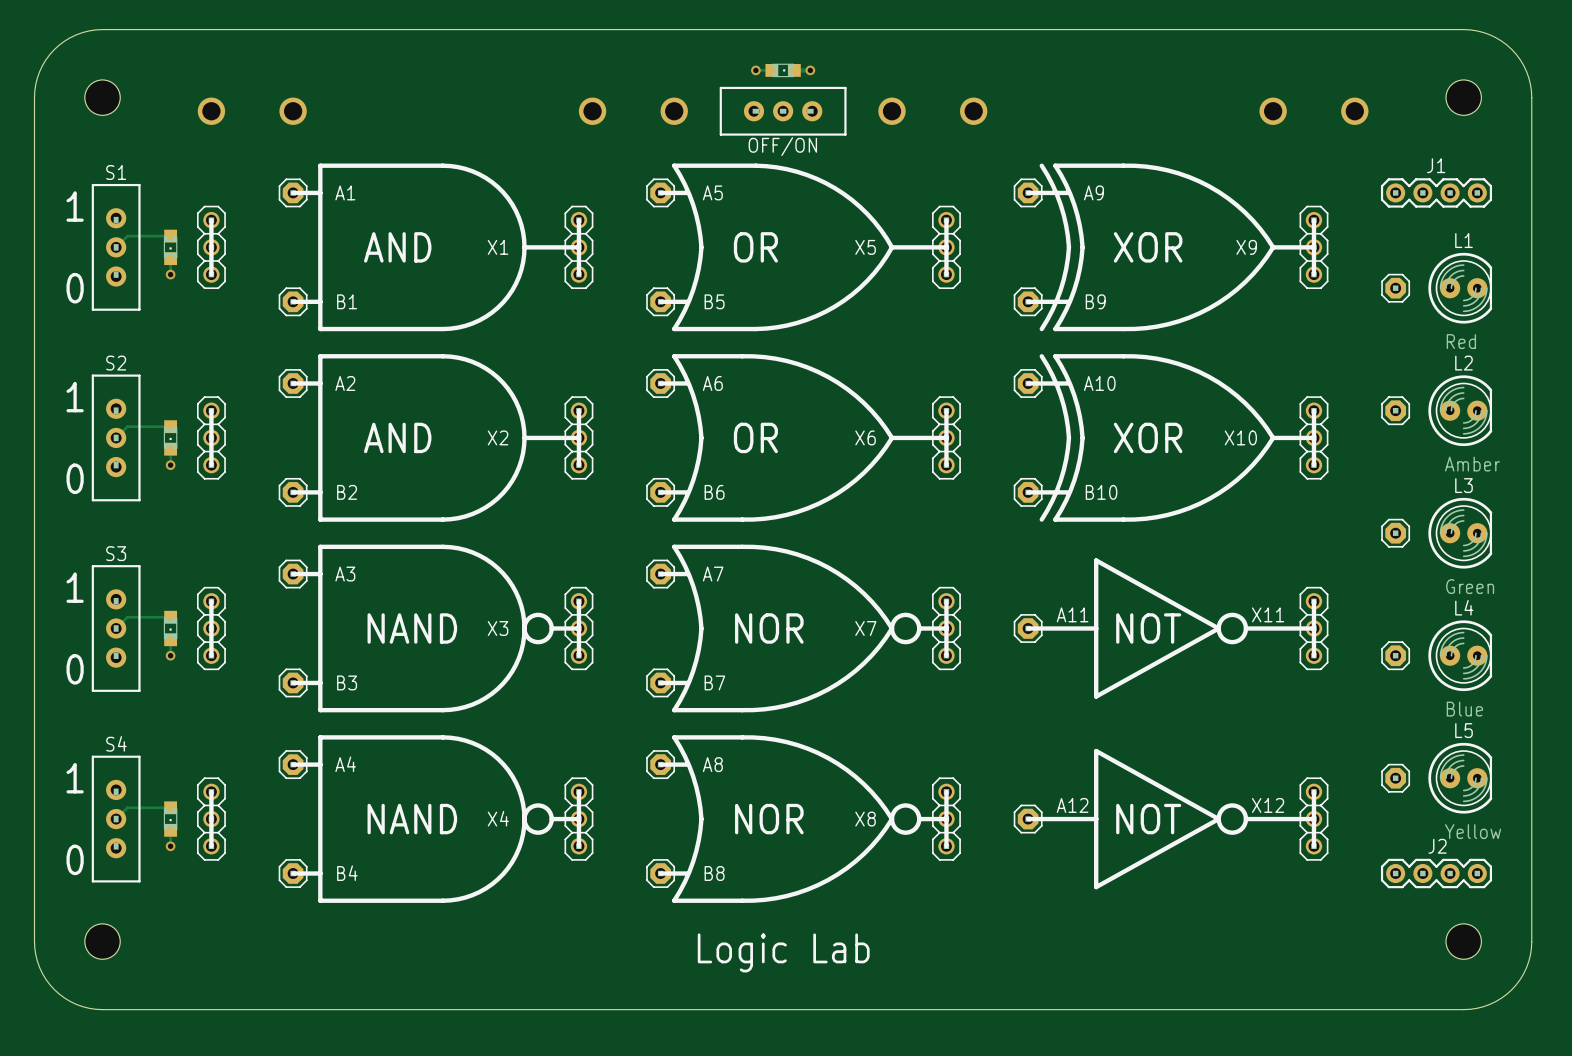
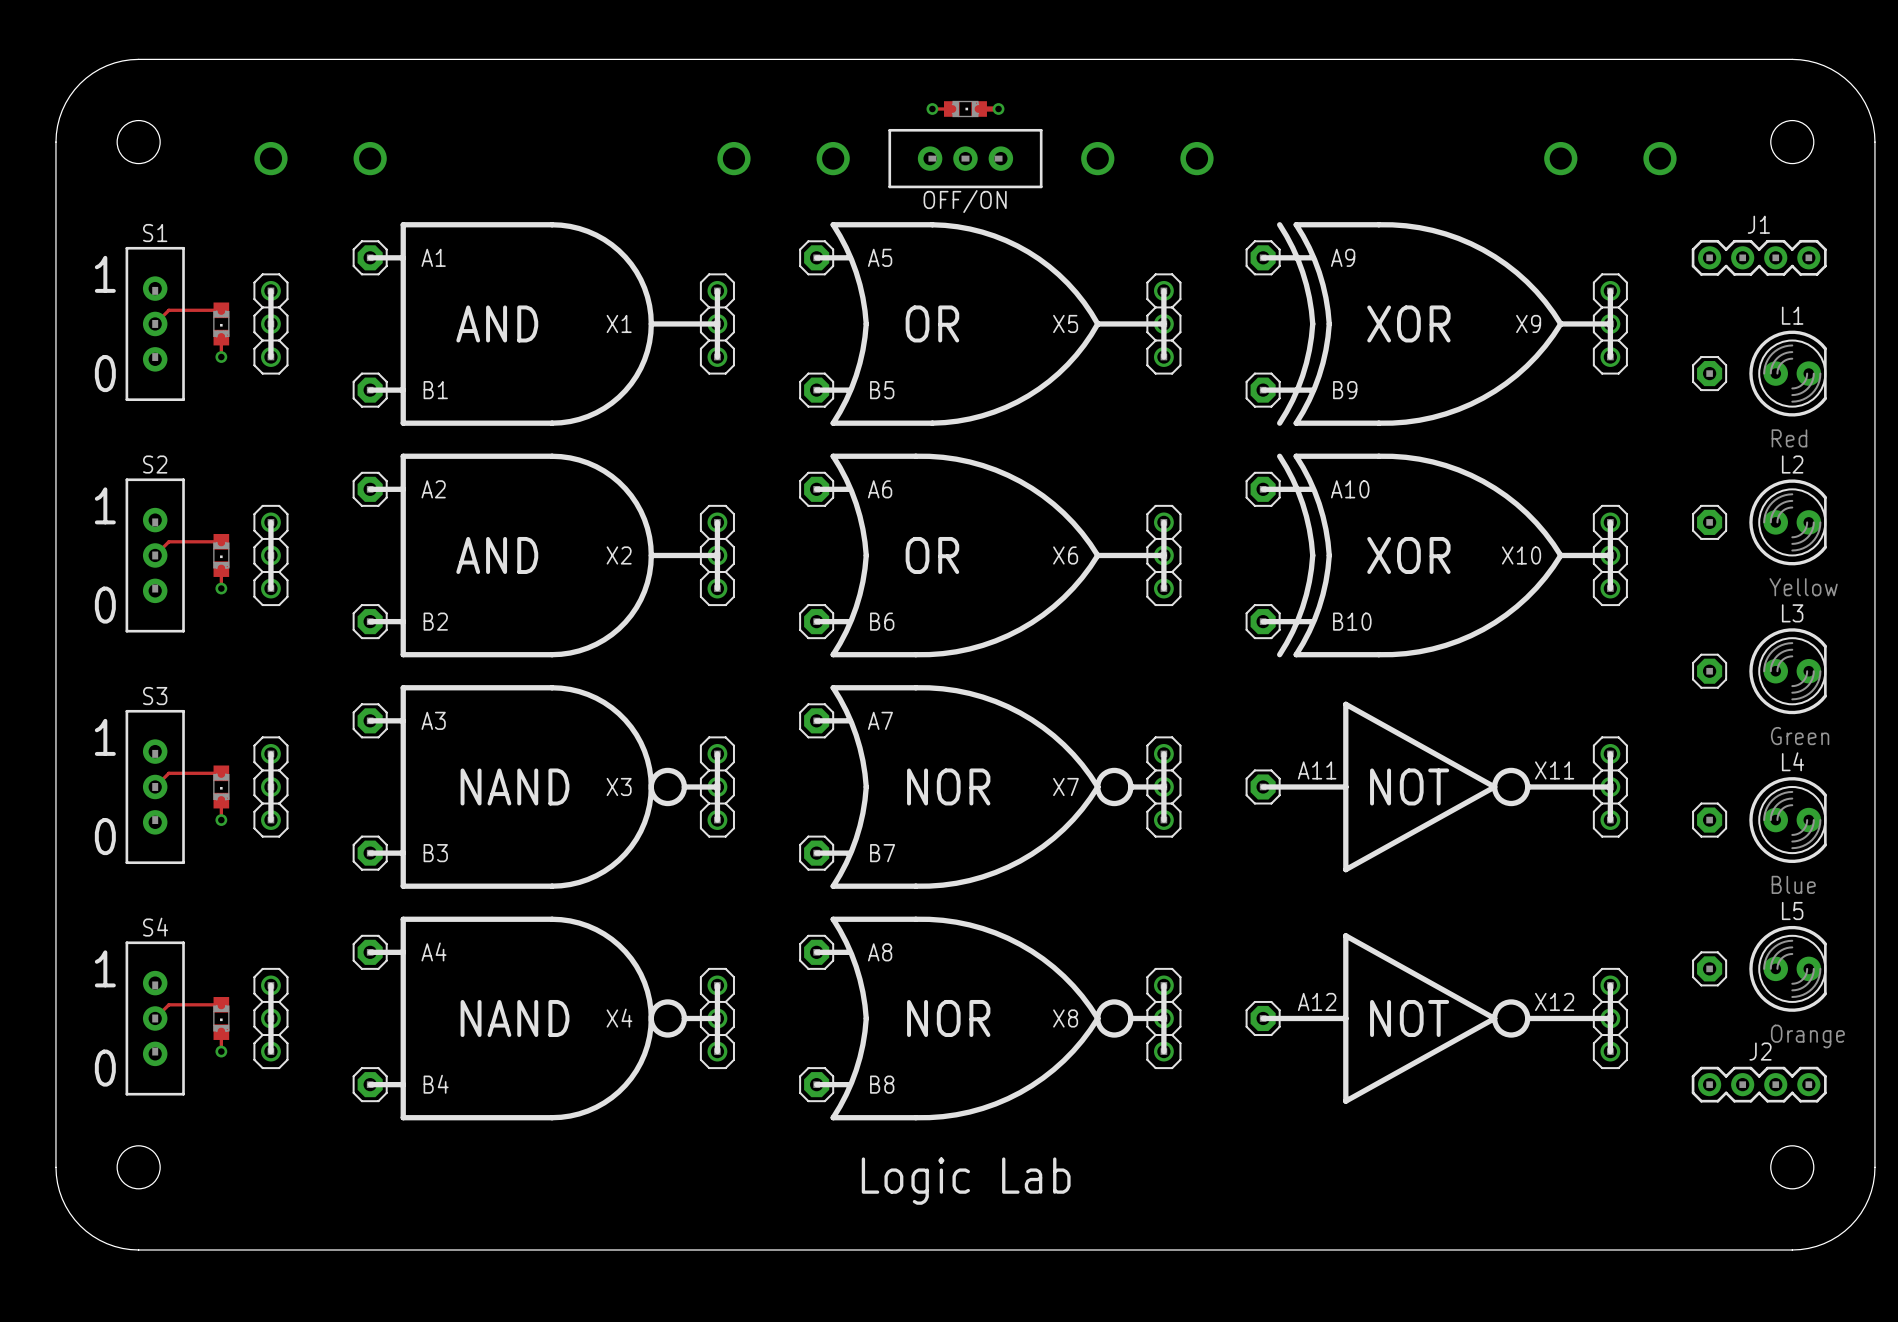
L2 value: Amber (1472, 464) -> Yellow (1803, 587)
L5 value: Yellow (1473, 831) -> Orange (1807, 1036)

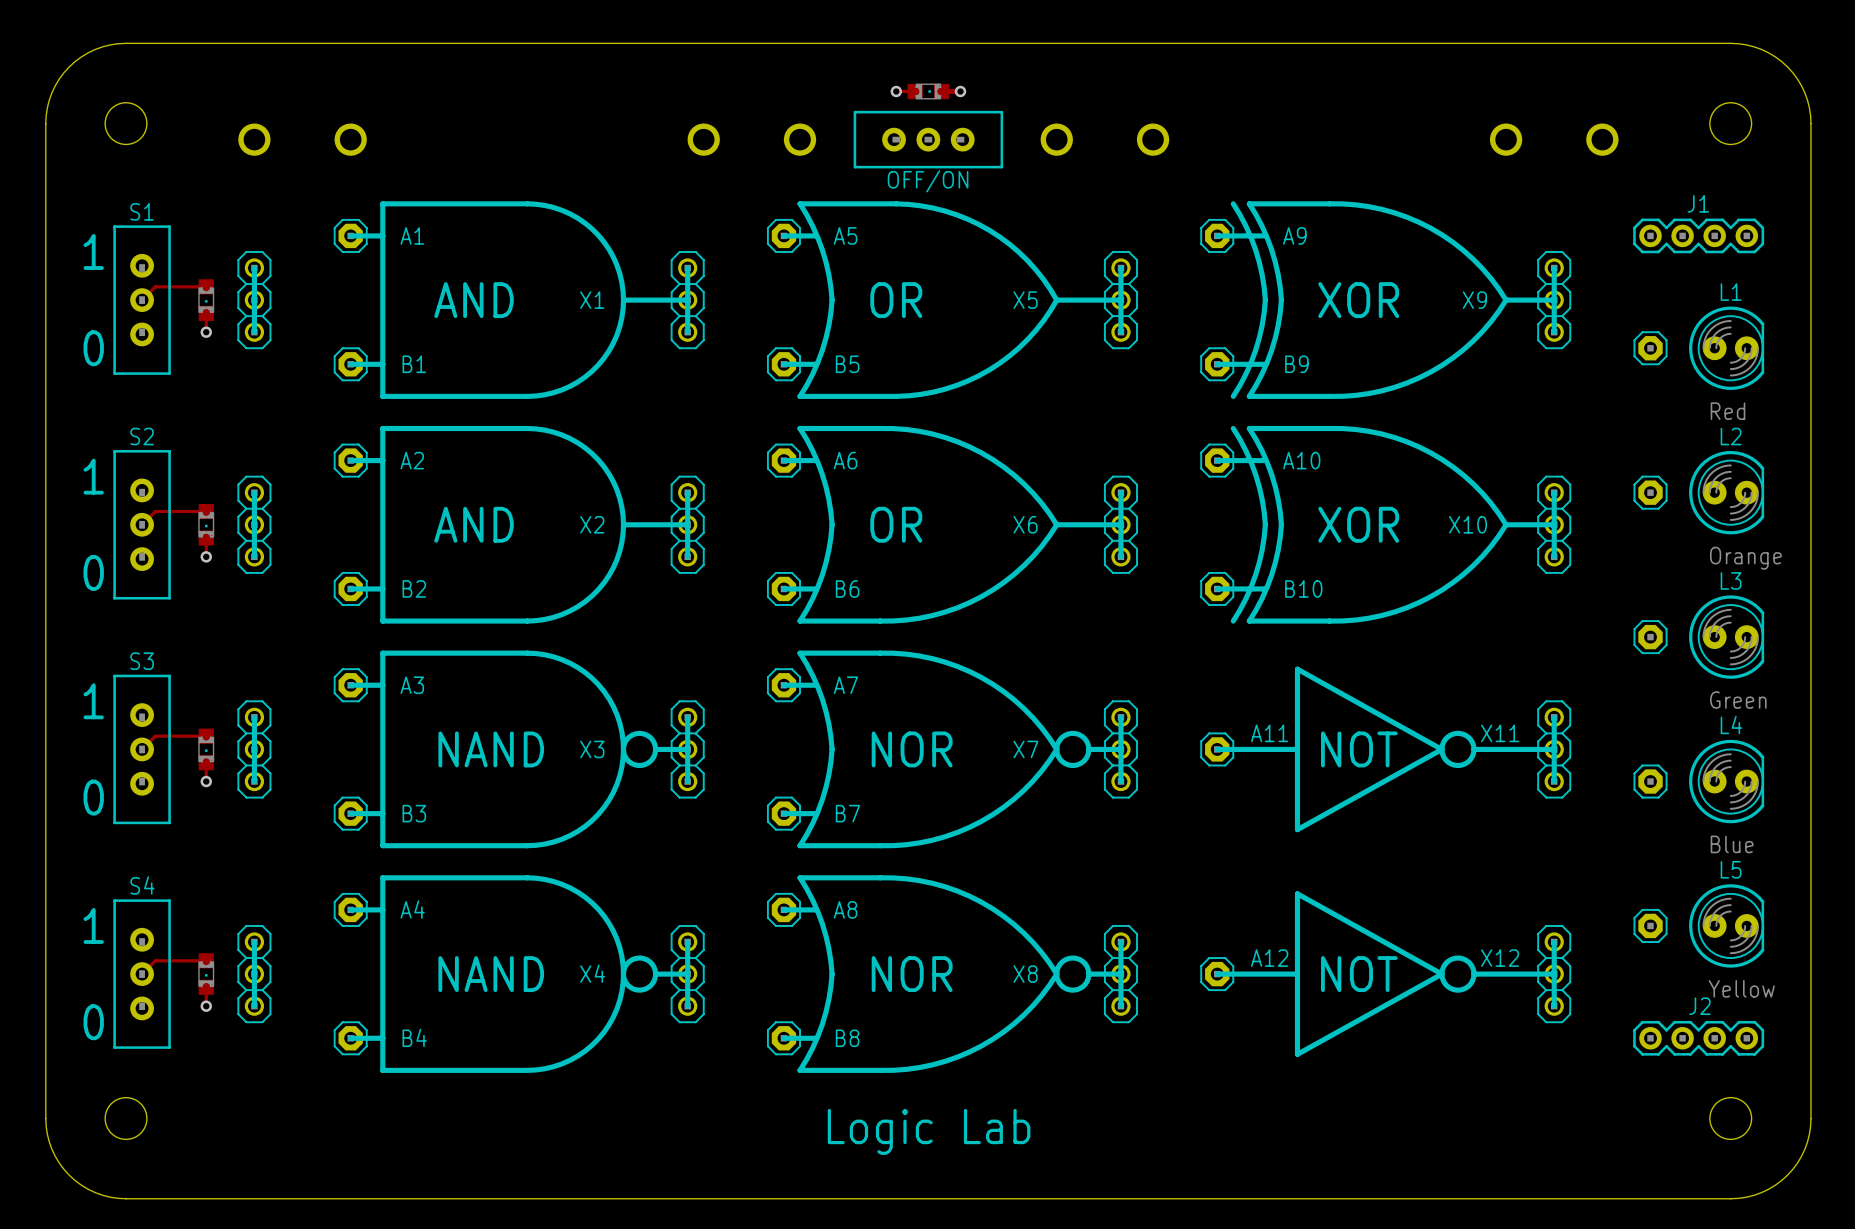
L2 value: Yellow (1803, 587) -> Orange (1745, 558)
L5 value: Orange (1807, 1036) -> Yellow (1741, 988)

